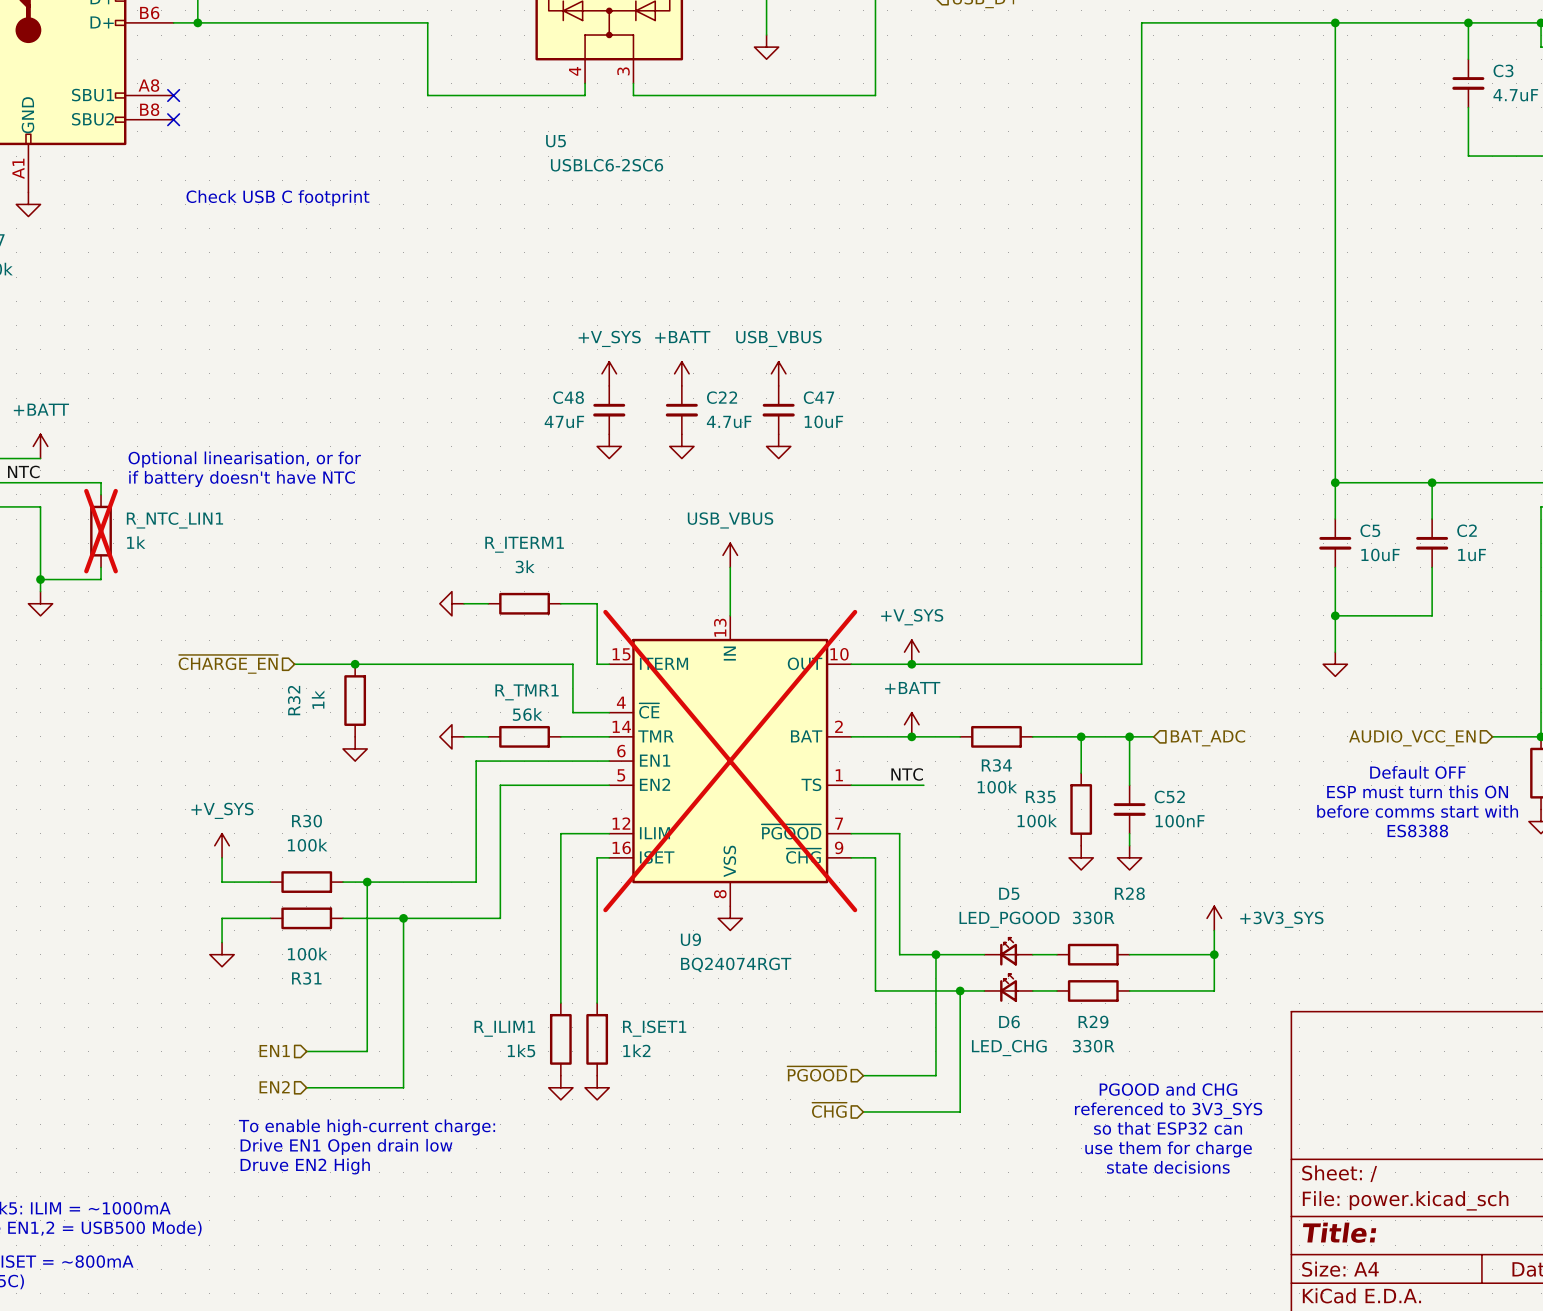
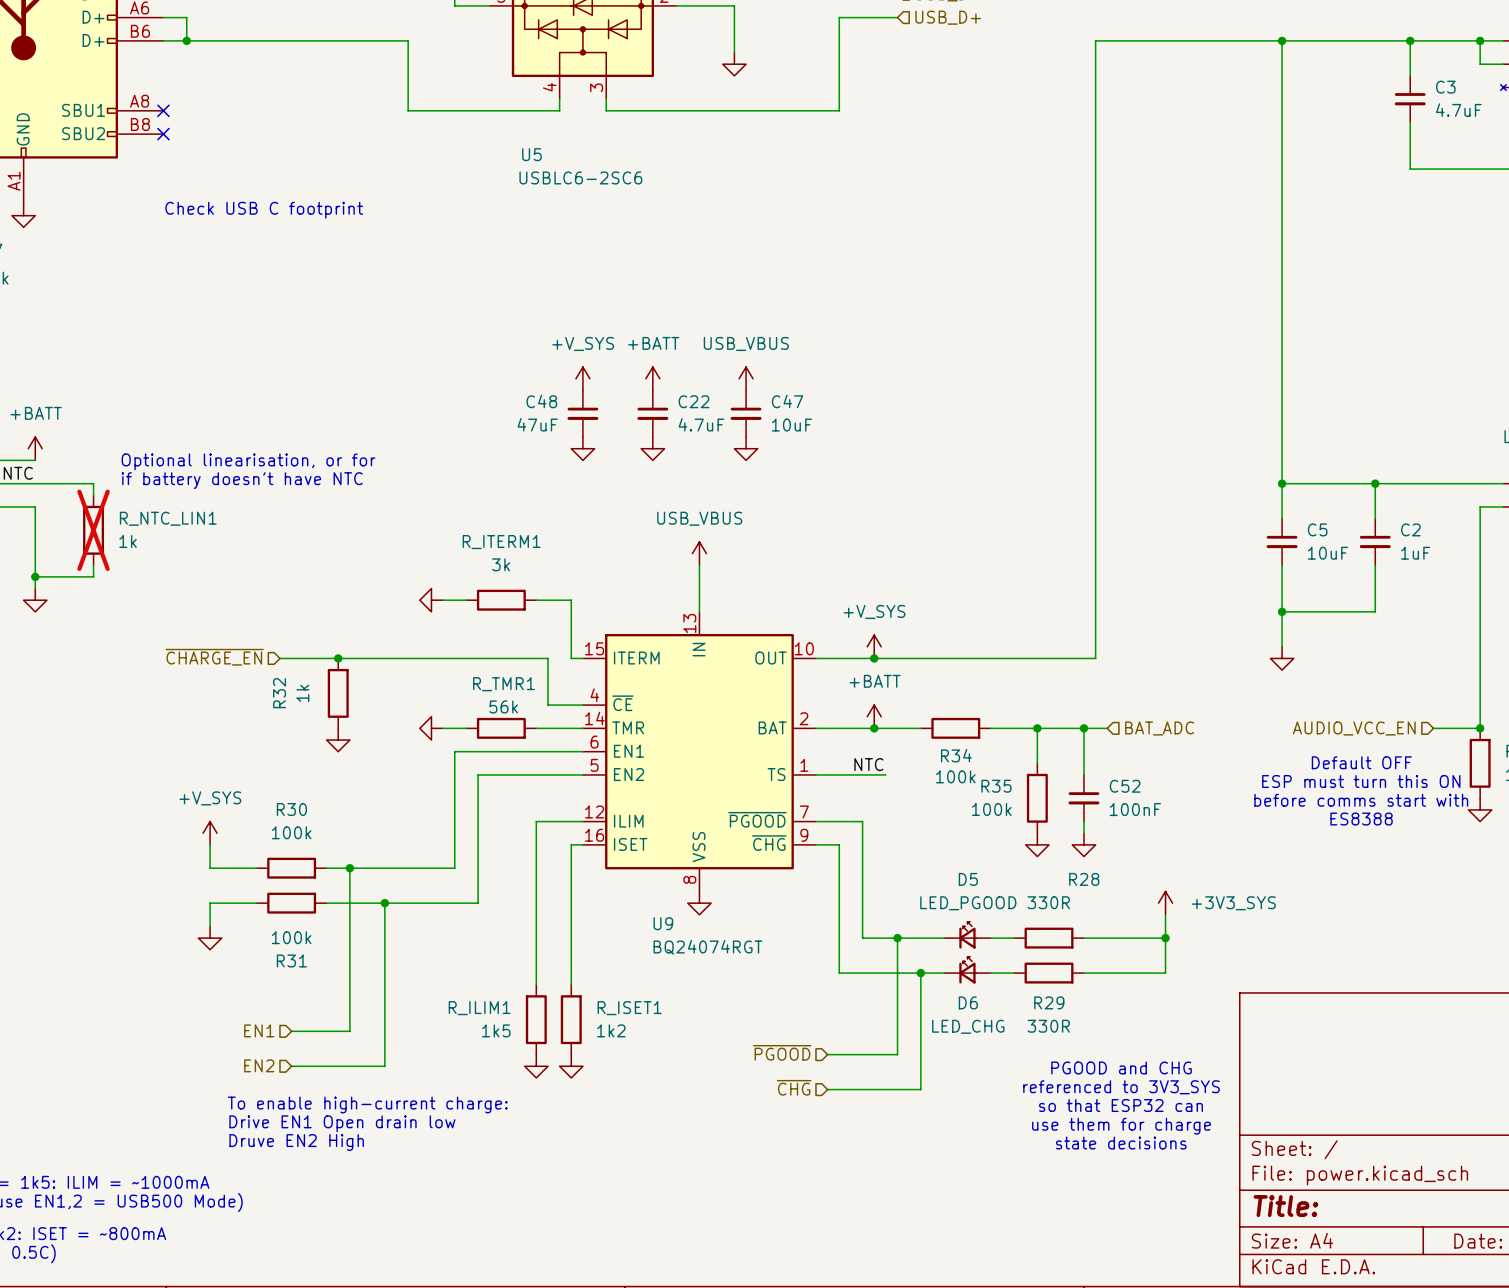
U9 do-not-place cross: (730, 761) -> none

